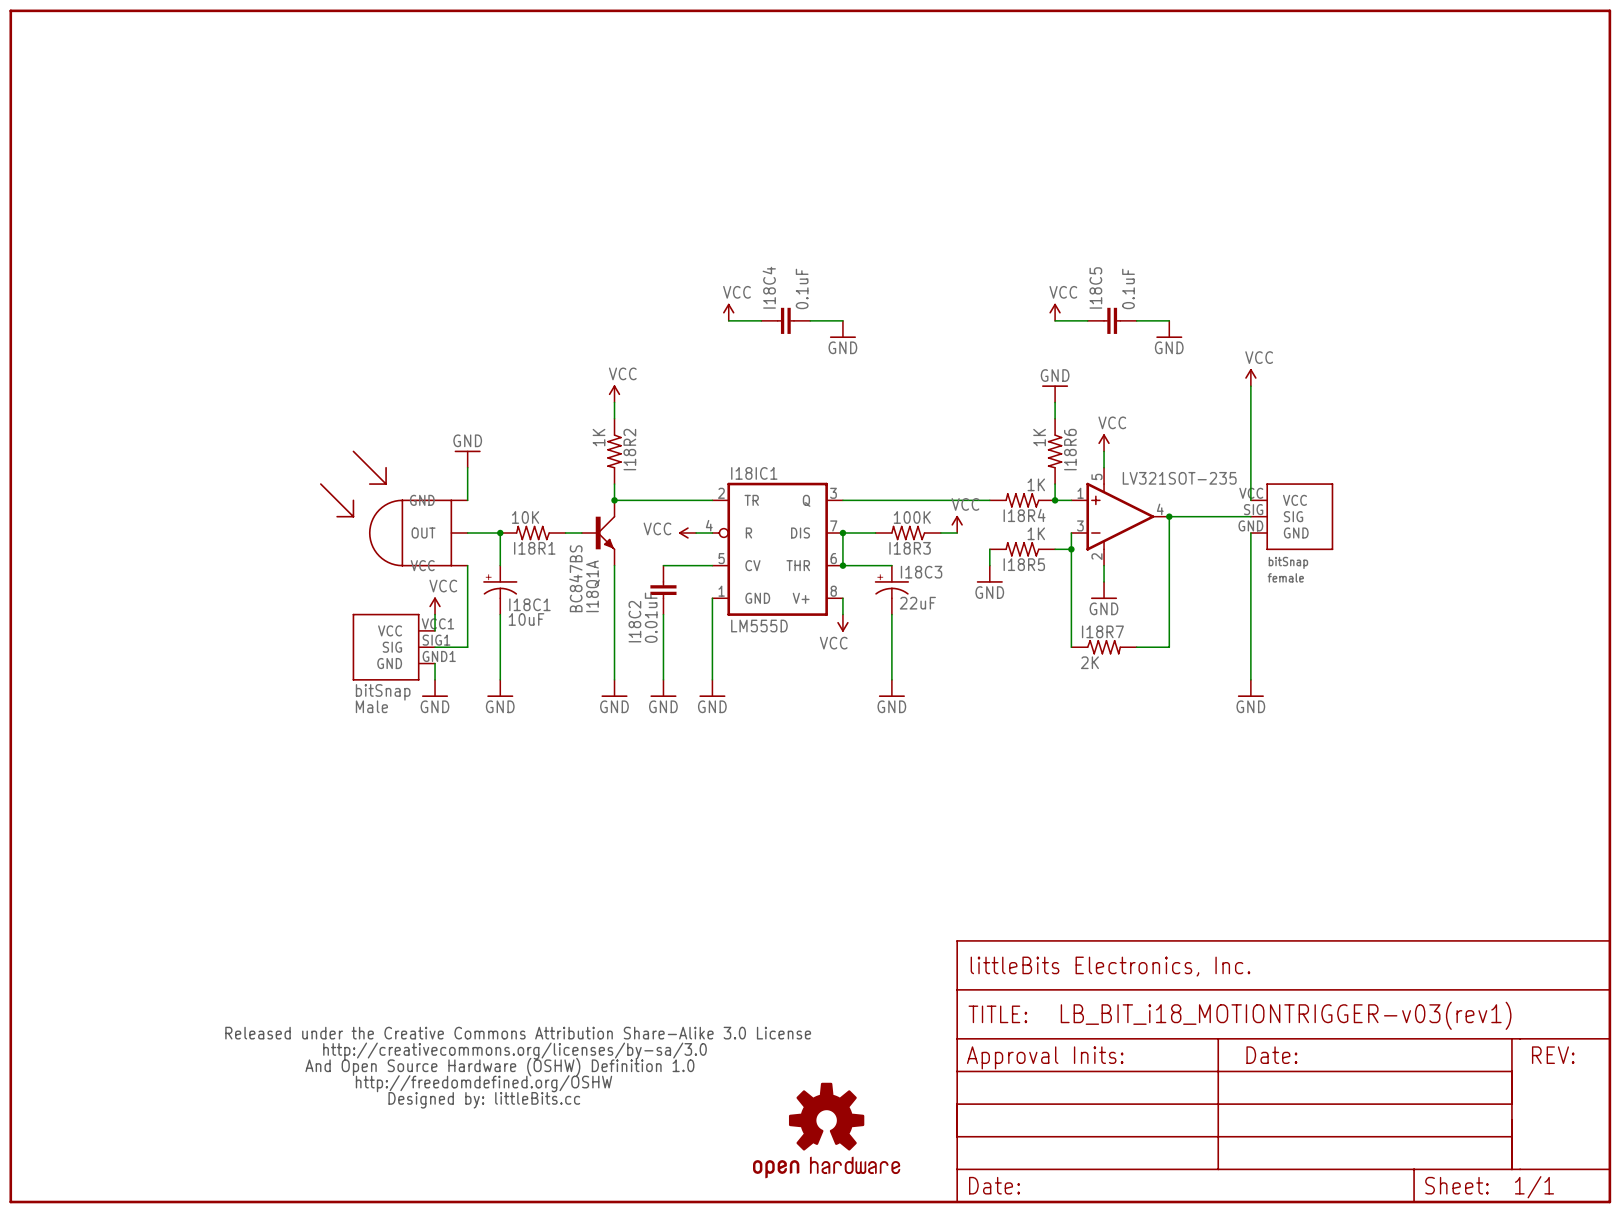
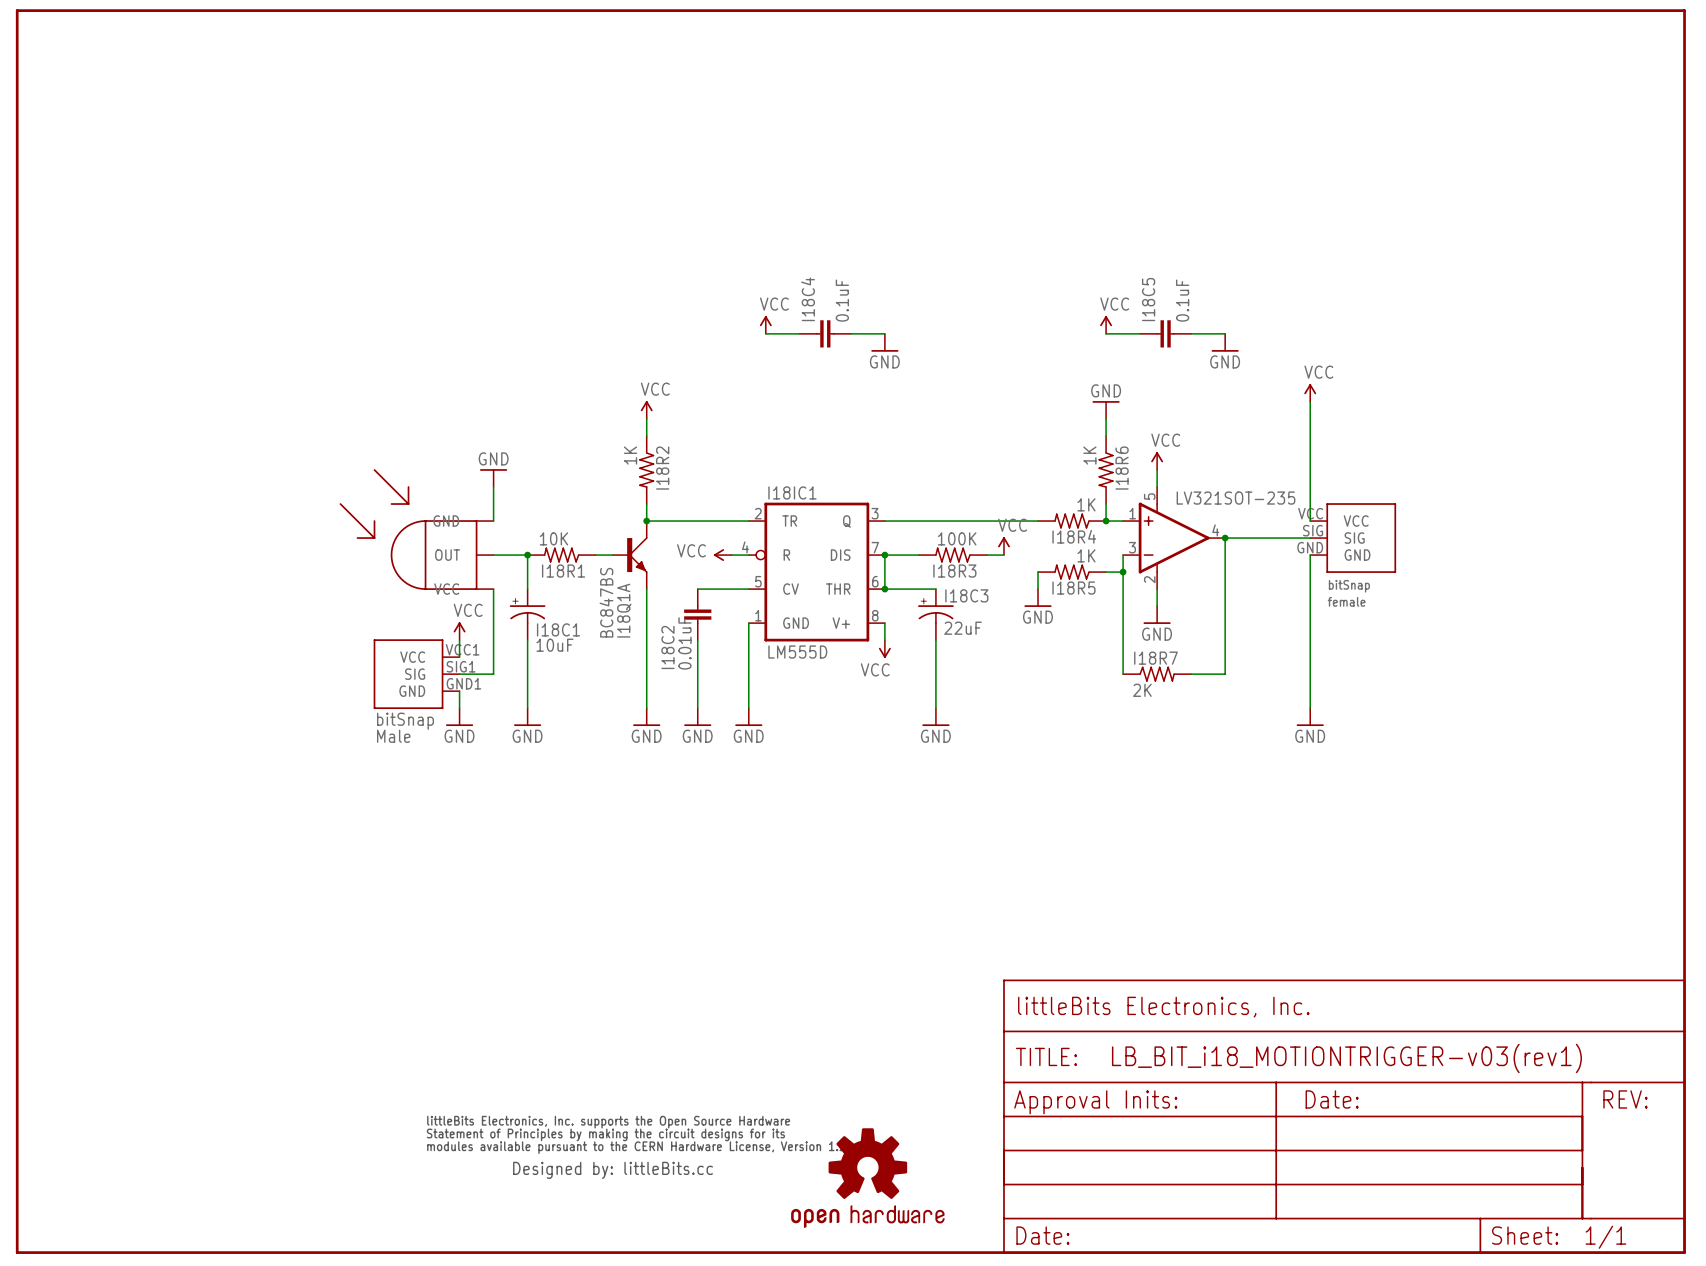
part: (518, 1067) -> none
part: none -> (636, 1147)

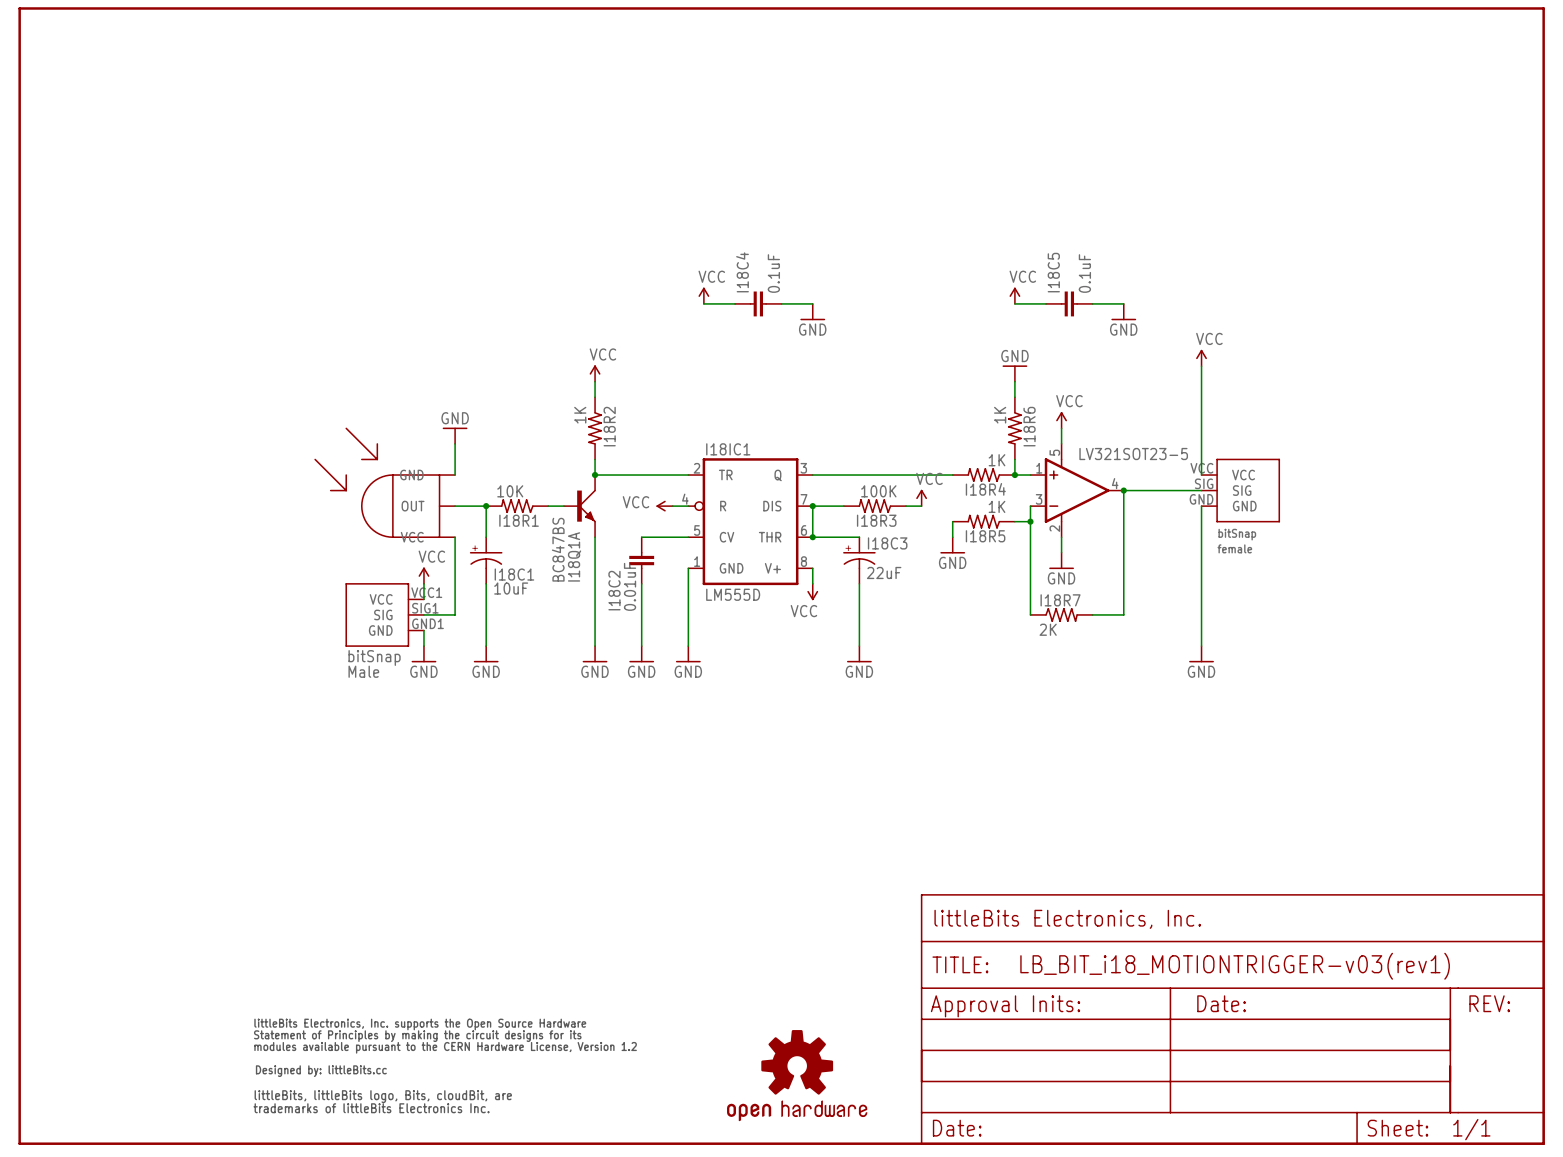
part value: LV321SOT-235 (1235, 498) -> LV321SOT23-5 (1133, 454)
part: (636, 1147) -> none
part: none -> (445, 1065)

